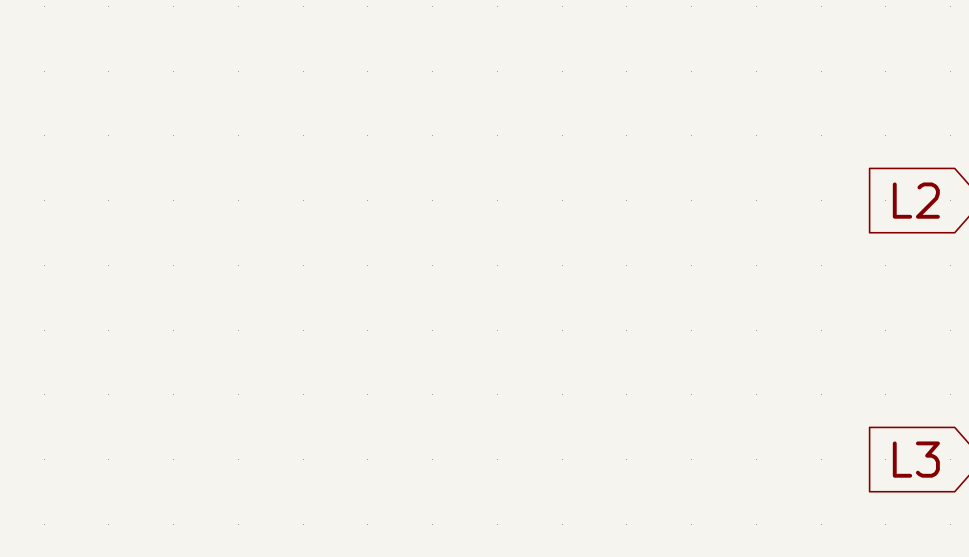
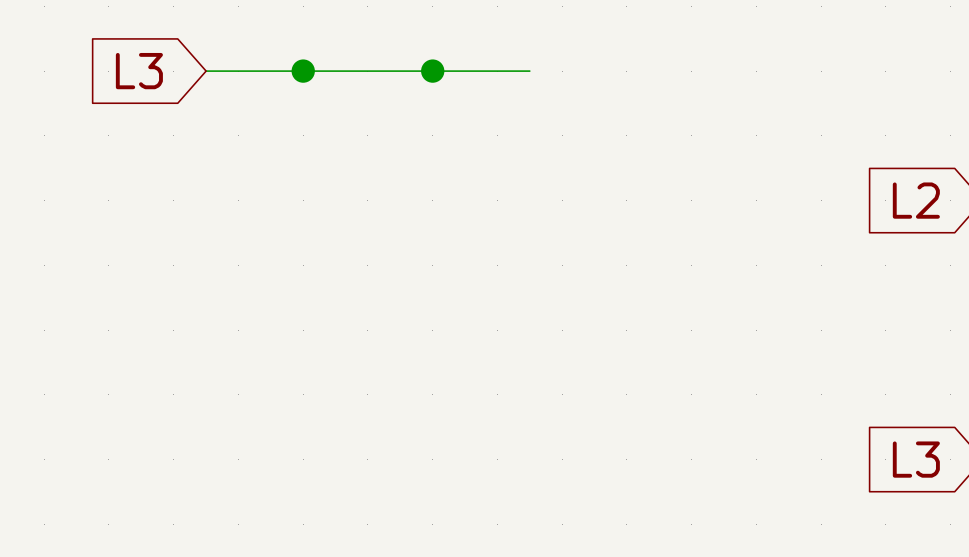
global label: none -> L3 (139, 71)
wire: none -> (206, 71) (529, 71)
junction: none -> (303, 71)
junction: none -> (432, 71)

